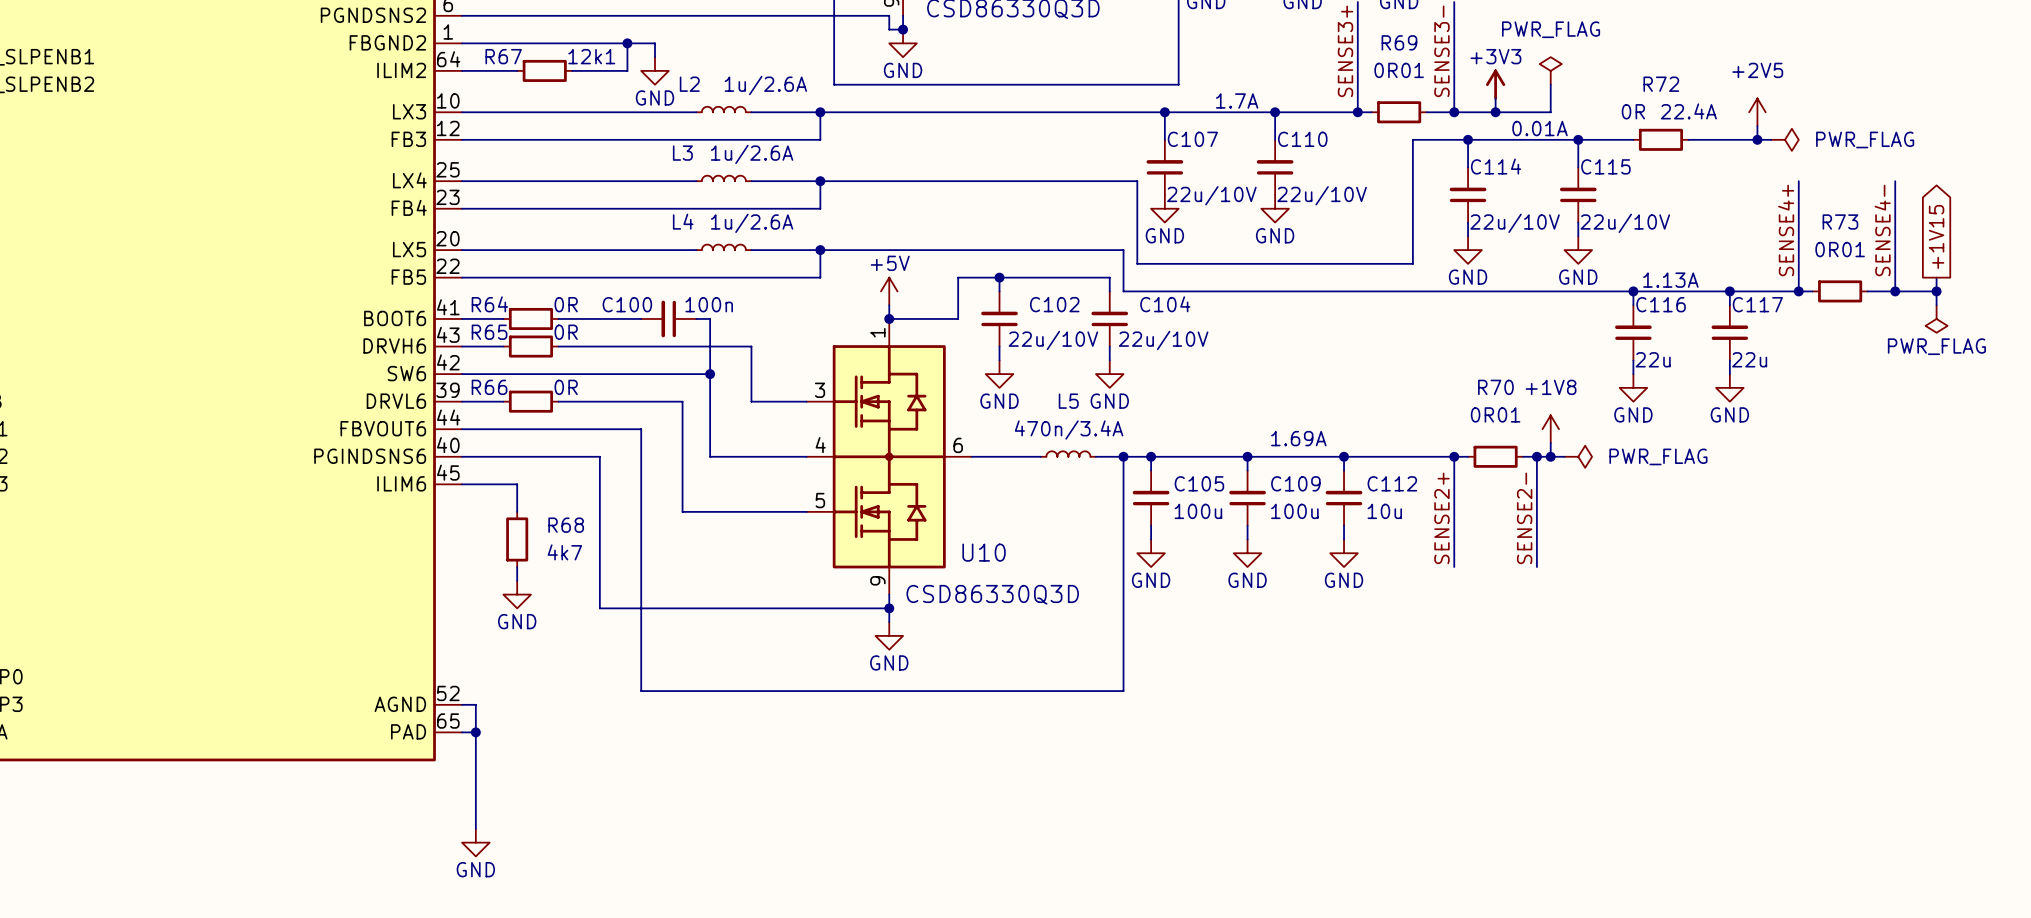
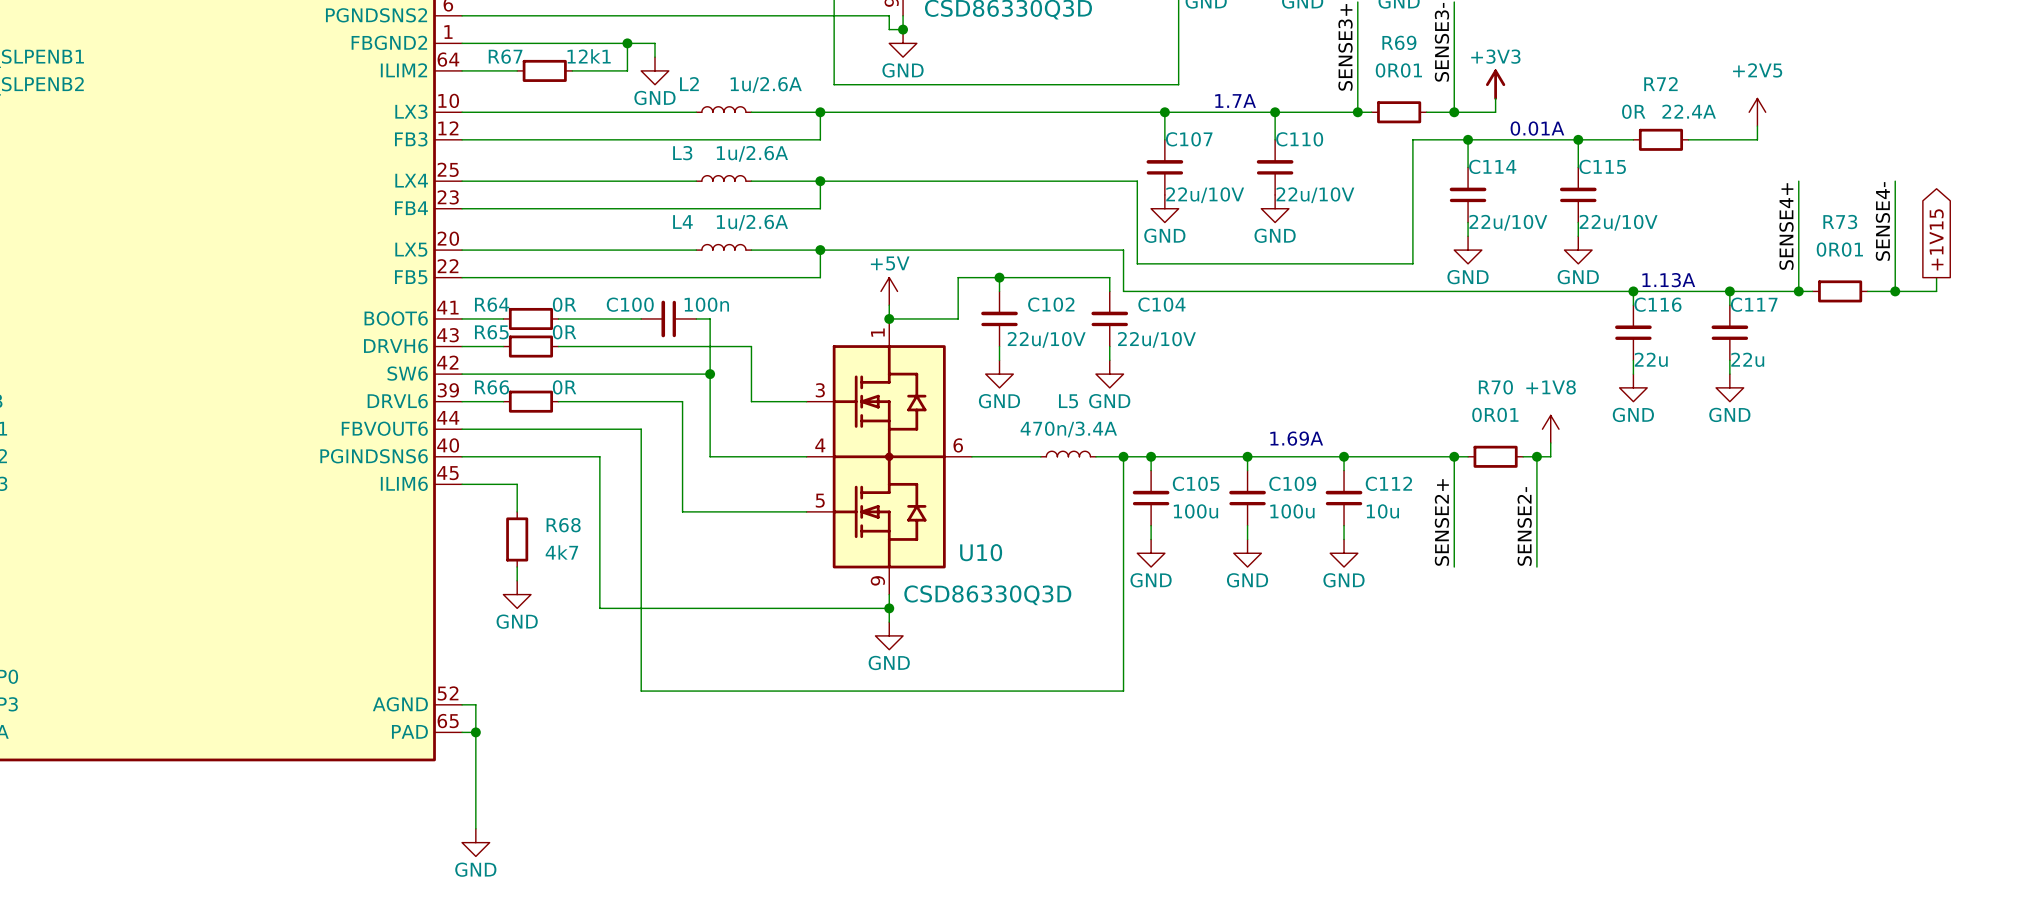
power symbol: PWR_FLAG (1550, 70) -> none
wire: (1550, 84) (1550, 112) (1495, 112) -> none
junction: (1495, 112) -> none
wire: (1757, 139) (1771, 139) -> none
junction: (1757, 139) -> none
power symbol: PWR_FLAG (1784, 139) -> none
wire: (1936, 291) (1936, 305) -> none
junction: (1936, 291) -> none
power symbol: PWR_FLAG (1936, 318) -> none
wire: (1550, 456) (1564, 456) -> none
junction: (1550, 456) -> none
power symbol: PWR_FLAG (1578, 456) -> none

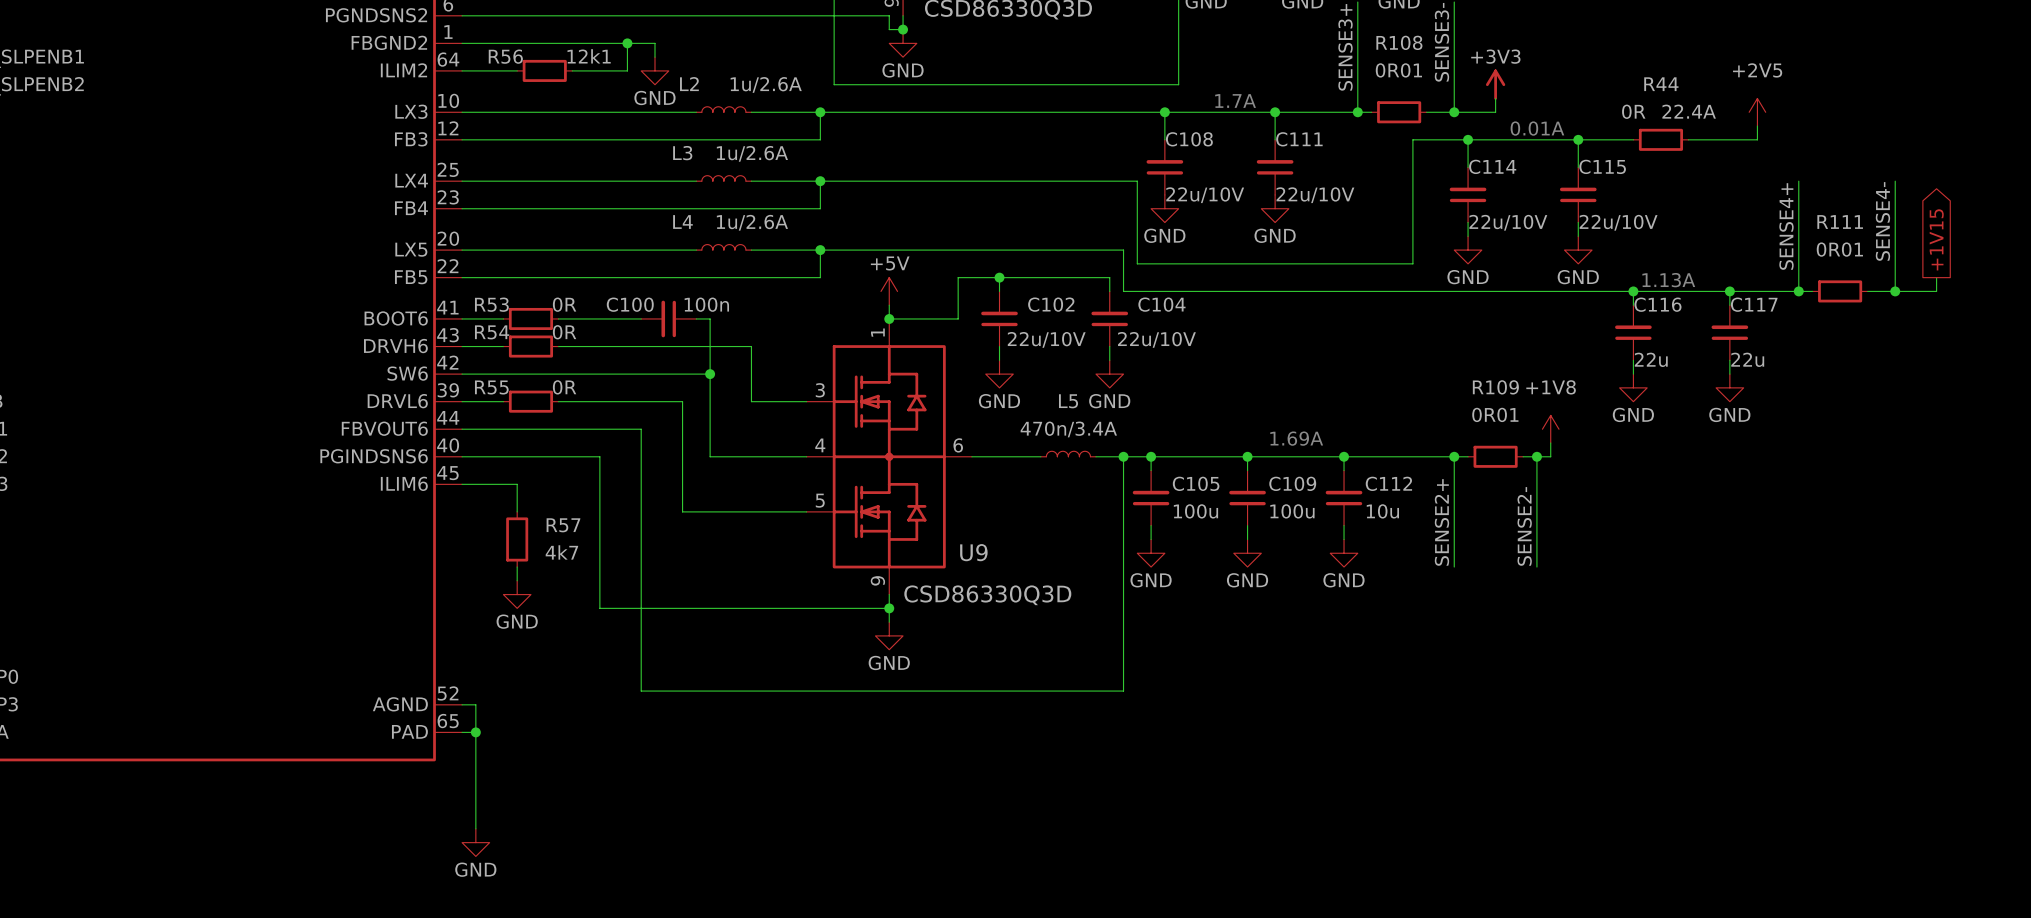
R69 name: R69 (1399, 42) -> R108 (1399, 42)
R67 name: R67 (505, 56) -> R56 (505, 56)
R72 name: R72 (1660, 84) -> R44 (1661, 84)
C107 name: C107 (1189, 139) -> C108 (1189, 139)
C110 name: C110 (1299, 139) -> C111 (1299, 139)
R73 name: R73 (1840, 222) -> R111 (1840, 222)
R64 name: R64 (492, 304) -> R53 (491, 304)
R65 name: R65 (491, 332) -> R54 (492, 332)
R66 name: R66 (492, 387) -> R55 (491, 387)
R70 name: R70 (1495, 387) -> R109 (1495, 387)
R68 name: R68 (563, 525) -> R57 (563, 525)
U10 name: U10 (981, 552) -> U9 (973, 552)

